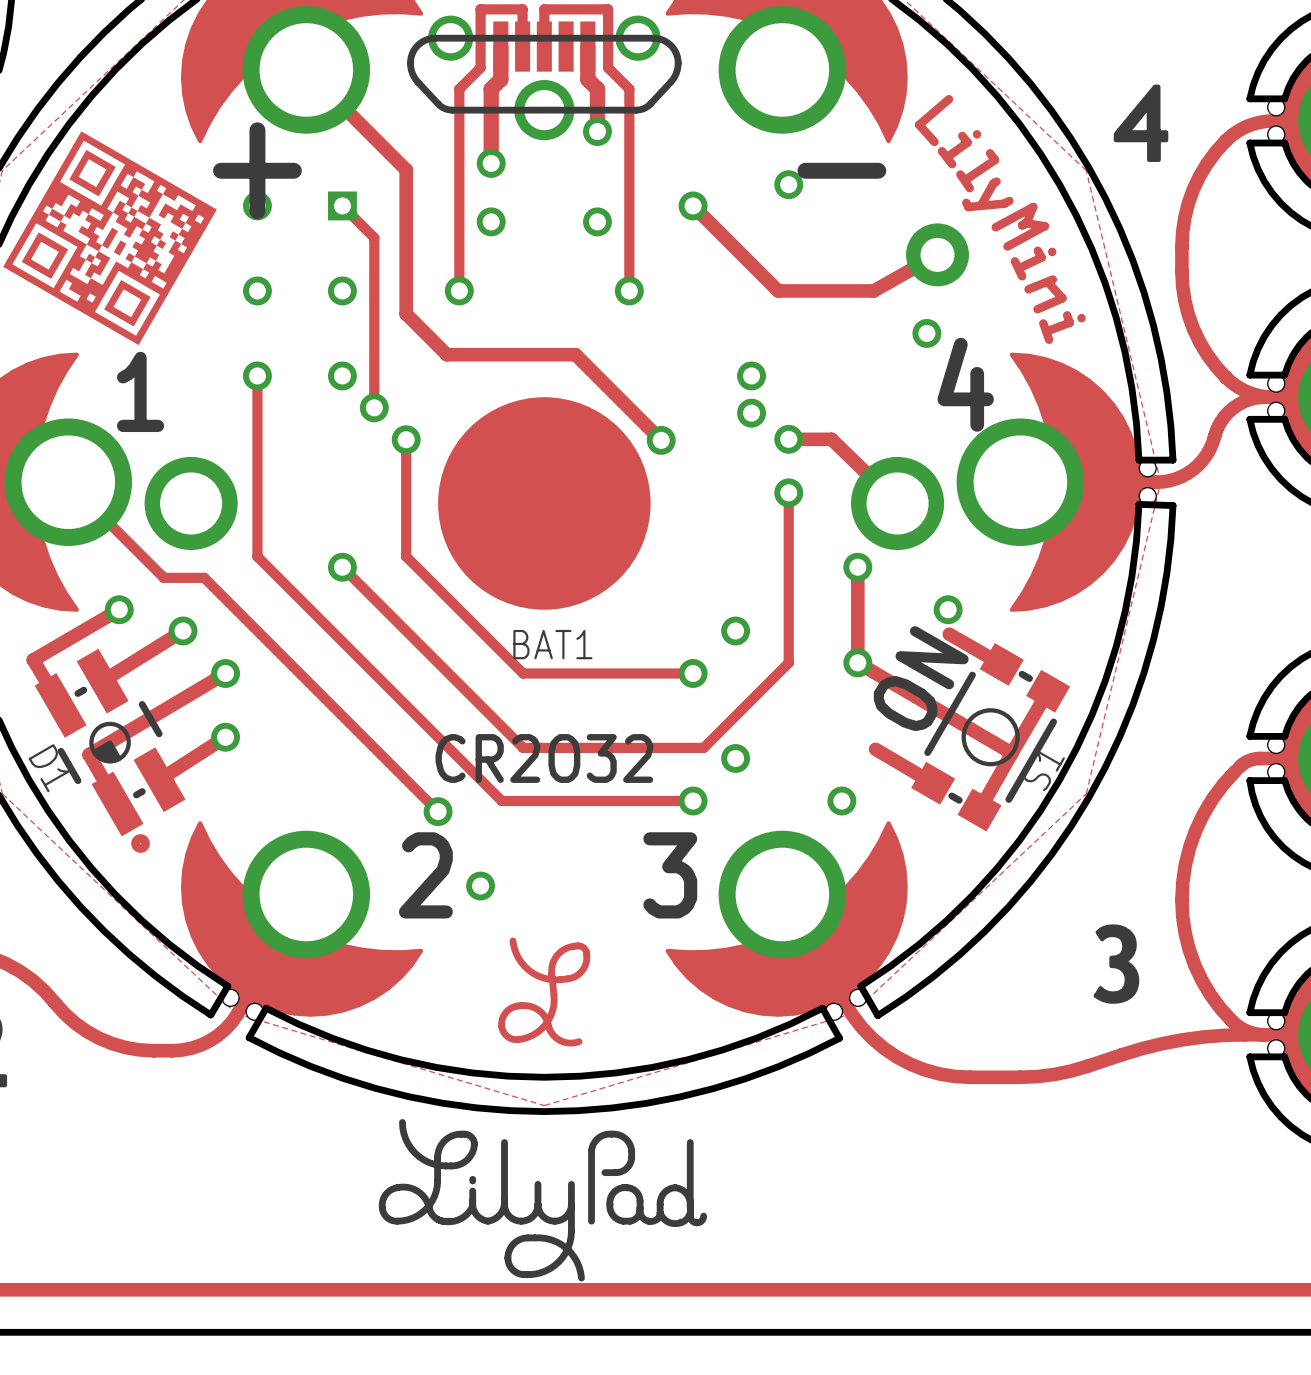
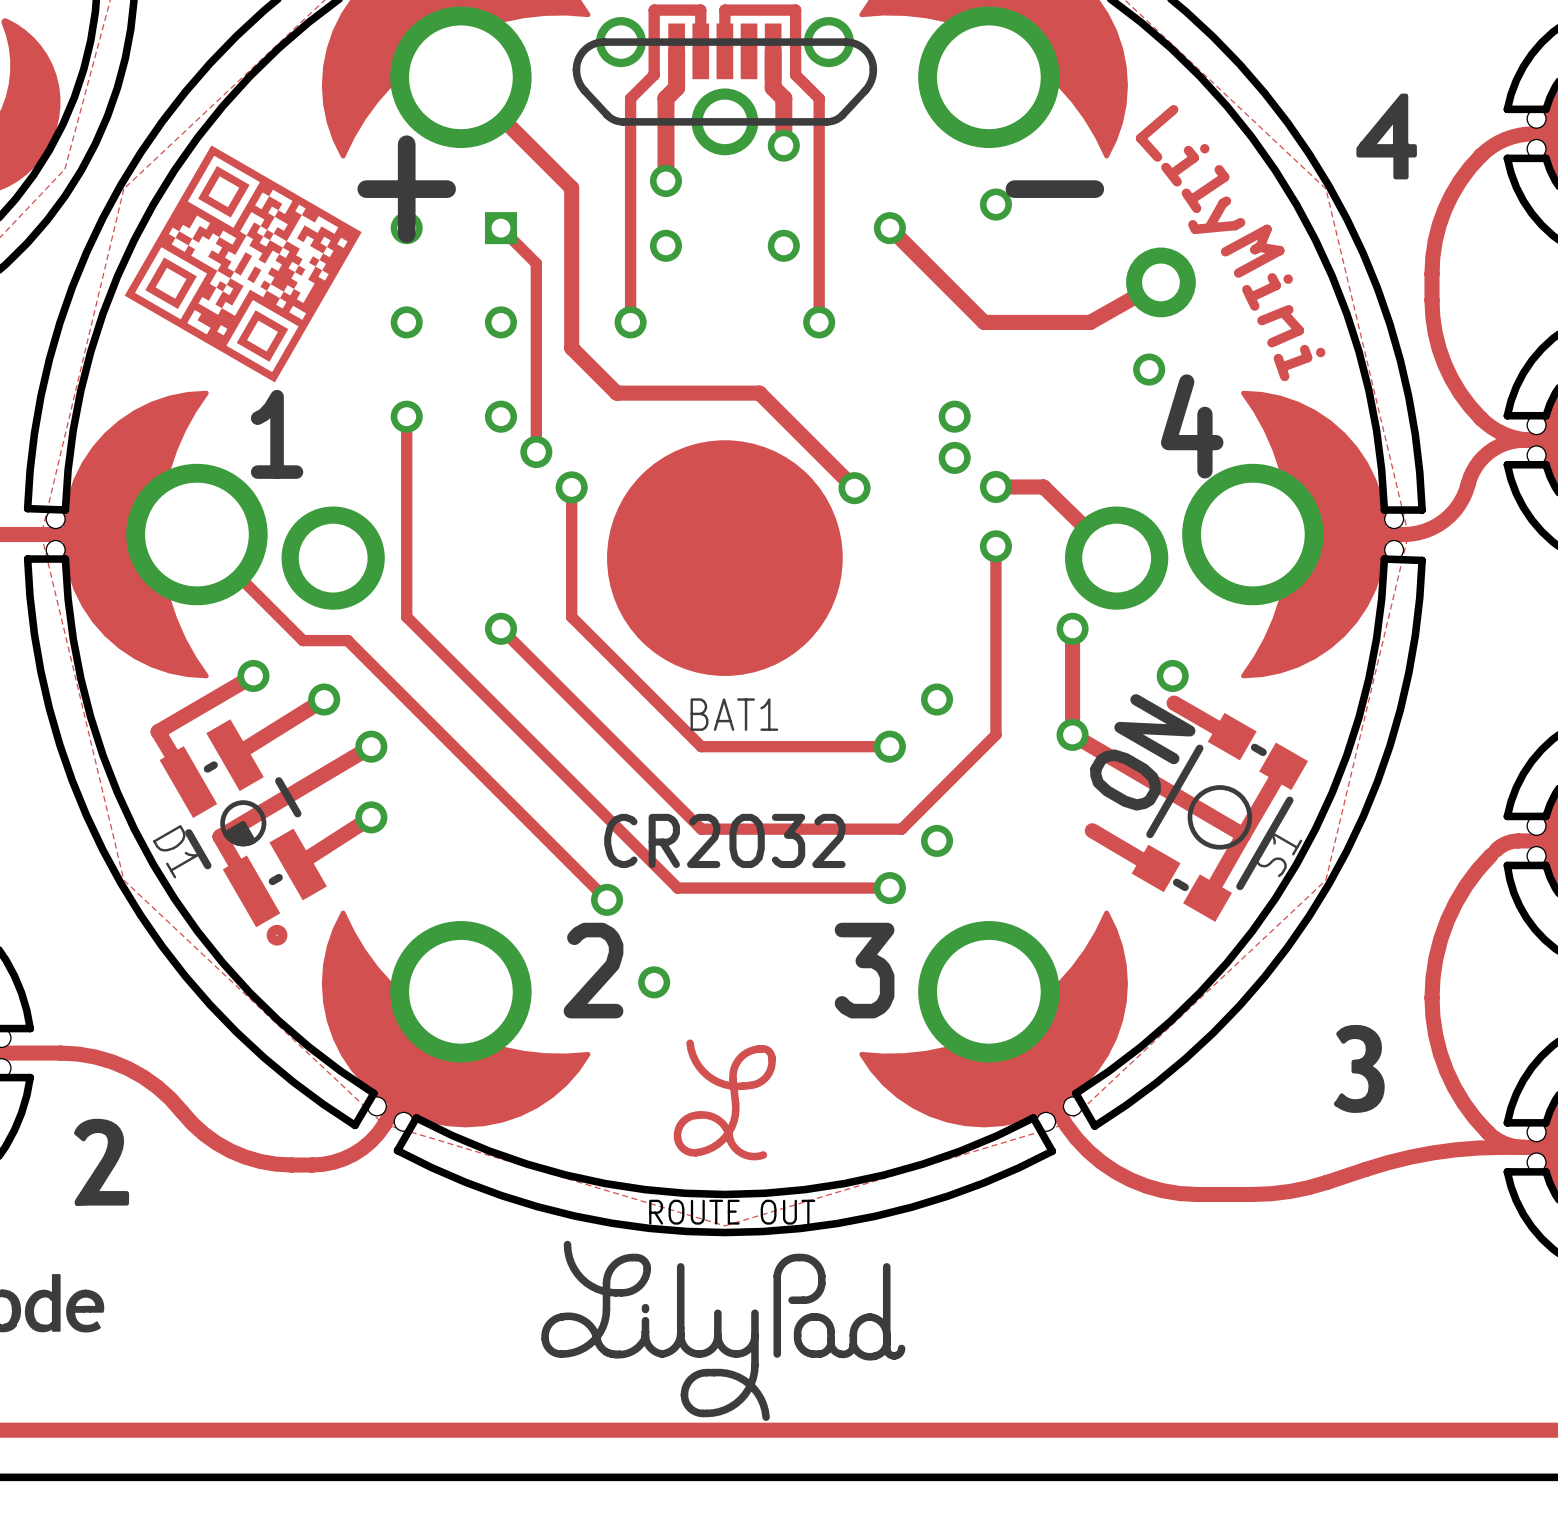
via: (841, 801) -> none
text: none -> ROUTE OUT (732, 1212)

